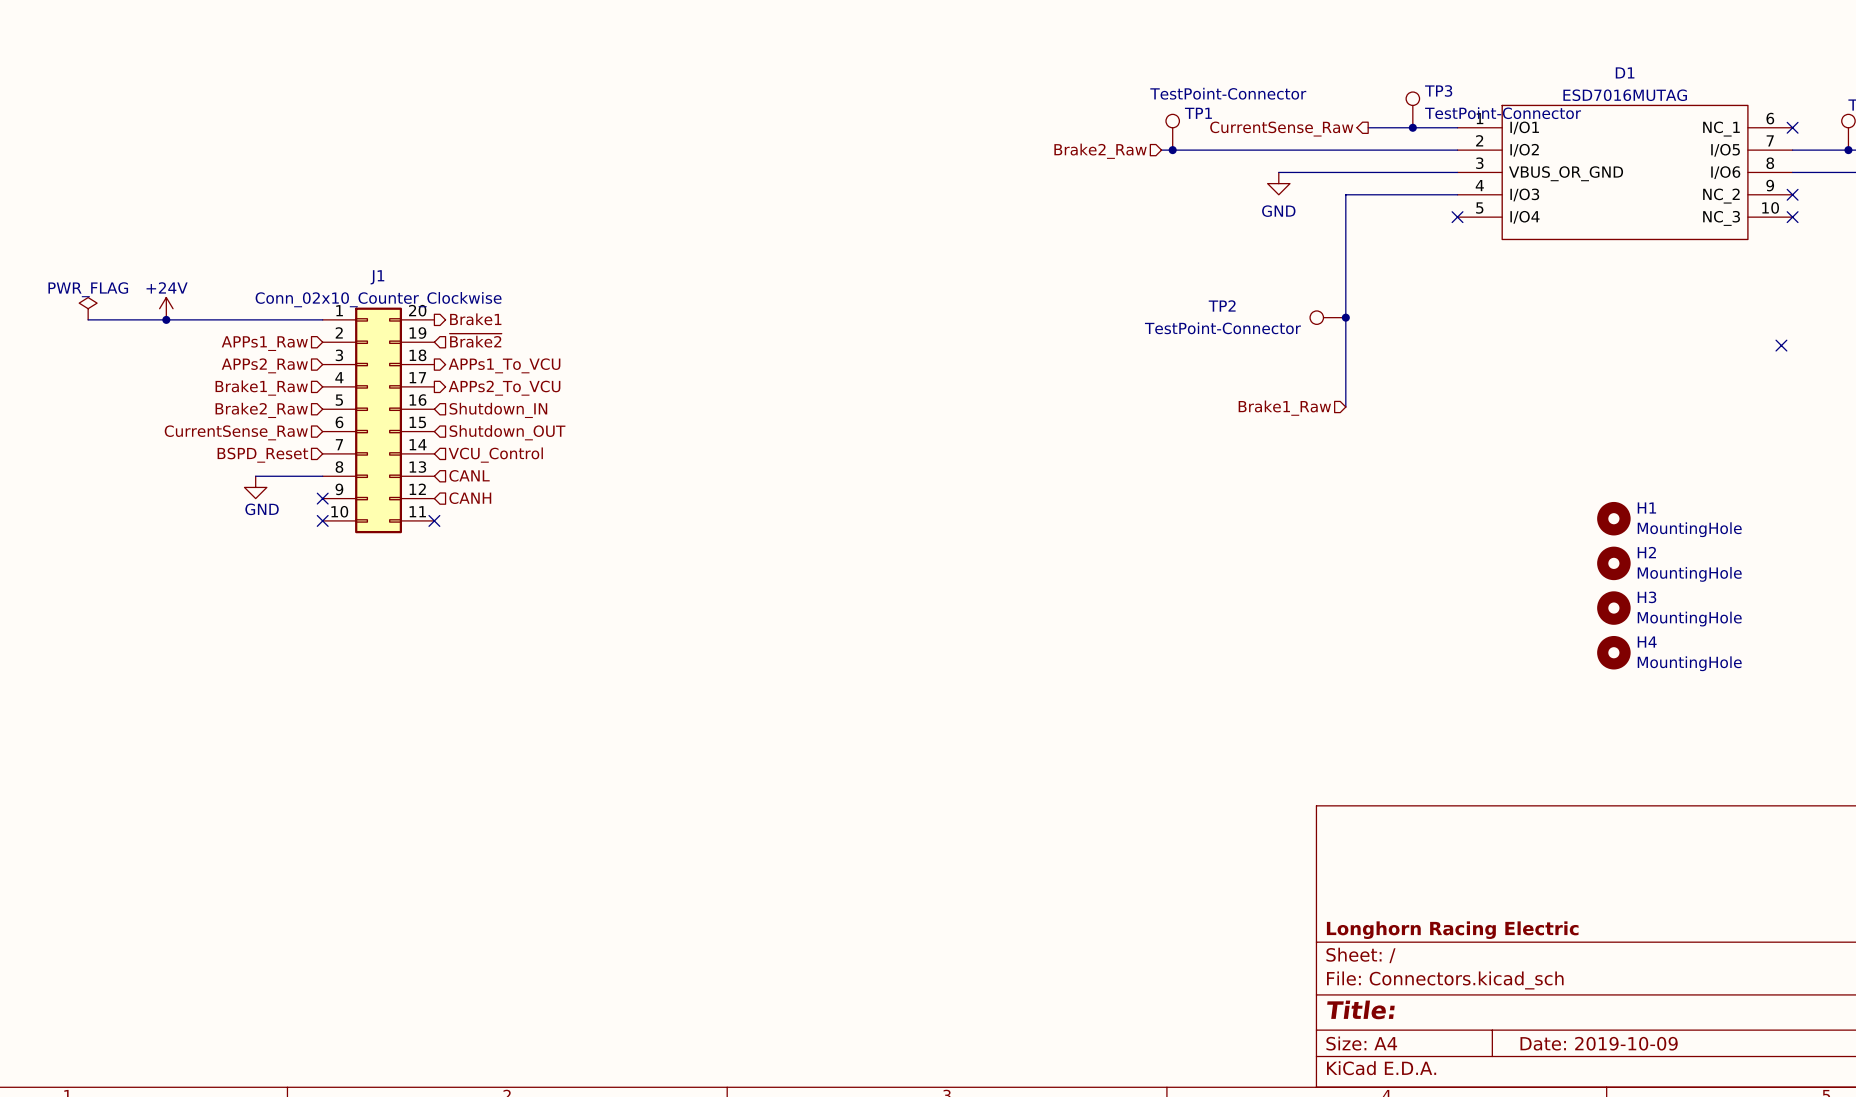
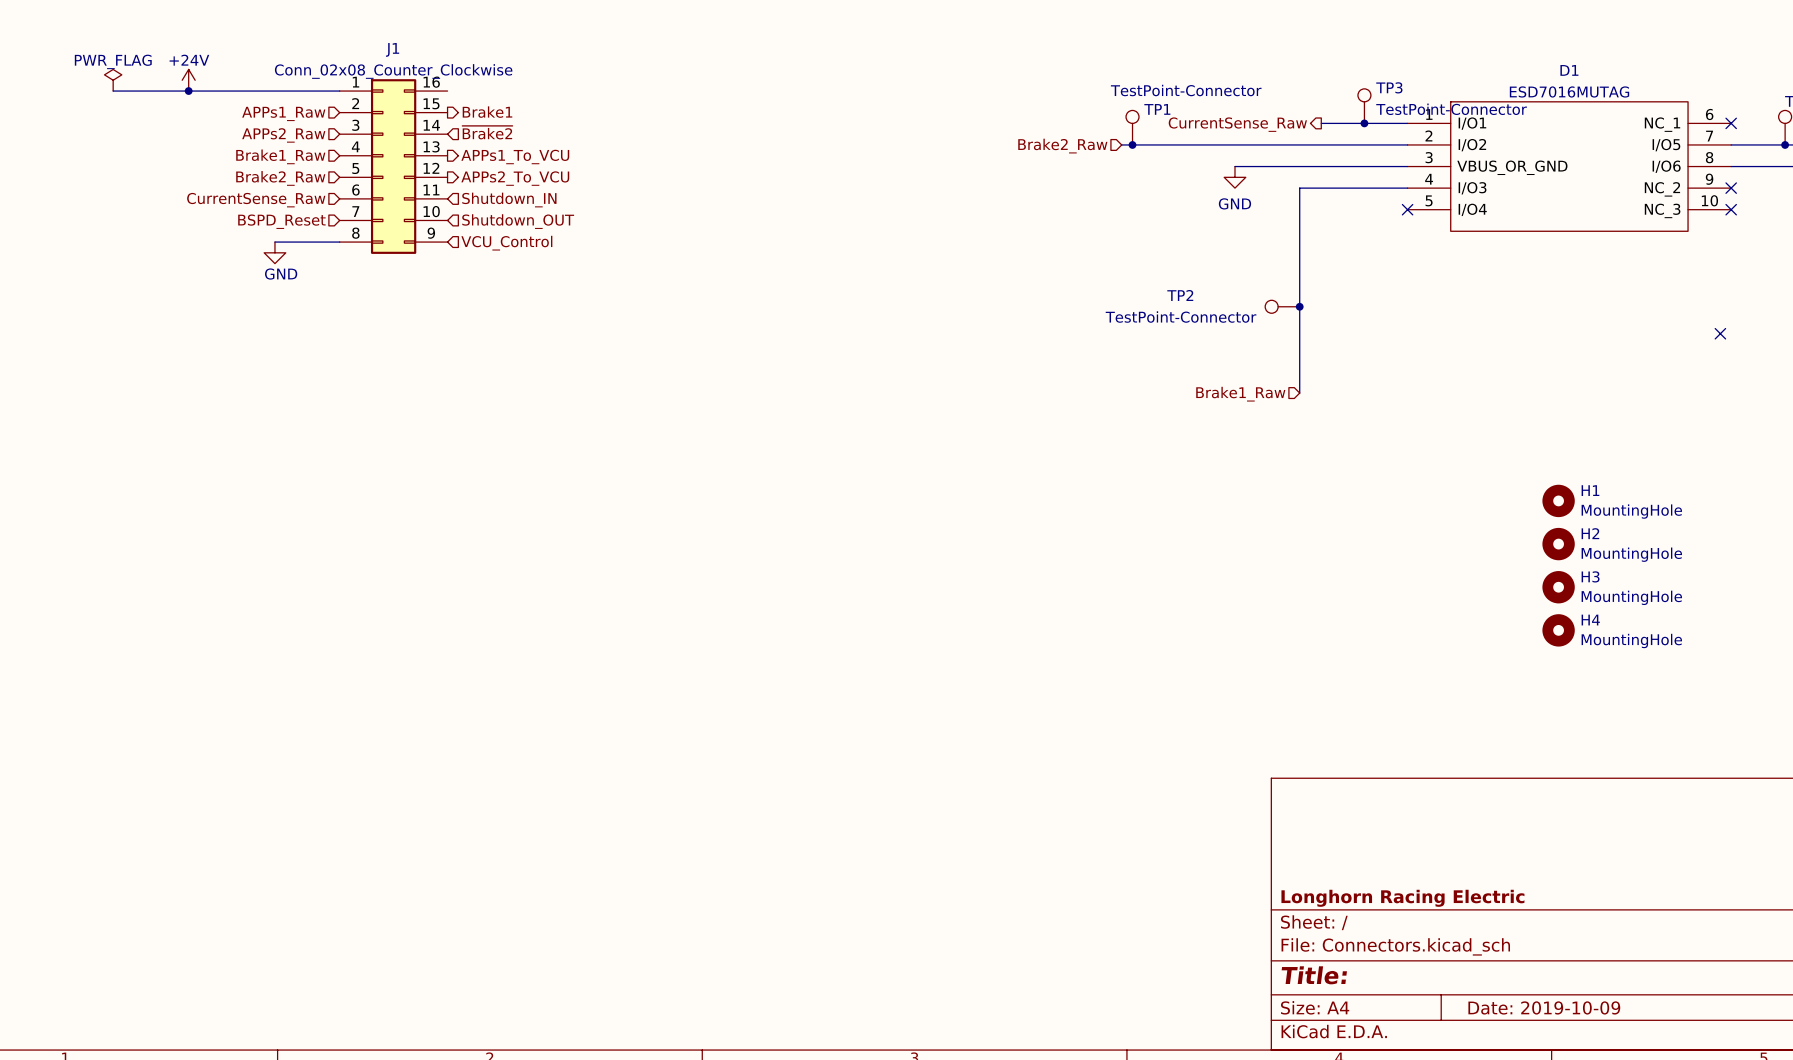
power symbol: none -> PWR_FLAG (113, 80)
power symbol: none -> +24V (188, 80)
wire: none -> (113, 91) (339, 91)
junction: none -> (188, 91)
hierarchical label: none -> APPs1_Raw (283, 113)
hierarchical label: none -> APPs2_Raw (283, 135)
hierarchical label: none -> Brake1_Raw (280, 156)
hierarchical label: none -> Brake2_Raw (280, 178)
hierarchical label: none -> CurrentSense_Raw (256, 200)
hierarchical label: none -> BSPD_Reset (281, 221)
wire: none -> (274, 242) (339, 242)
power symbol: none -> GND (274, 252)
J1 name position: J1 (377, 277) -> J1 (392, 49)
J1 value: Conn_02x10_Counter_Clockwise (378, 299) -> Conn_02x08_Counter_Clockwise (393, 71)
J1 symbol: [322, 307, 435, 534] -> [339, 79, 448, 254]
power symbol: PWR_FLAG (88, 308) -> none
power symbol: +24V (166, 308) -> none
wire: (88, 319) (322, 319) -> none
junction: (166, 319) -> none
hierarchical label position: Brake1 (475, 319) -> Brake1 (487, 112)
hierarchical label position: ~{Brake2} (475, 340) -> ~{Brake2} (487, 132)
hierarchical label: APPs1_Raw (264, 343) -> none
hierarchical label: APPs2_Raw (264, 365) -> none
hierarchical label position: APPs1_To_VCU (504, 365) -> APPs1_To_VCU (515, 157)
hierarchical label: Brake1_Raw (261, 388) -> none
hierarchical label position: APPs2_To_VCU (504, 388) -> APPs2_To_VCU (515, 178)
hierarchical label: Brake2_Raw (261, 410) -> none
hierarchical label position: Shutdown_IN (498, 410) -> Shutdown_IN (509, 200)
hierarchical label: CurrentSense_Raw (236, 432) -> none
hierarchical label position: Shutdown_OUT (507, 432) -> Shutdown_OUT (518, 221)
hierarchical label: BSPD_Reset (262, 455) -> none
hierarchical label position: VCU_Control (495, 455) -> VCU_Control (506, 243)
hierarchical label: CANL (469, 475) -> none
wire: (255, 476) (322, 476) -> none
power symbol: GND (255, 487) -> none
no-connect mark: (322, 498) -> none
hierarchical label: CANH (470, 498) -> none
no-connect mark: (322, 520) -> none
no-connect mark: (434, 520) -> none

